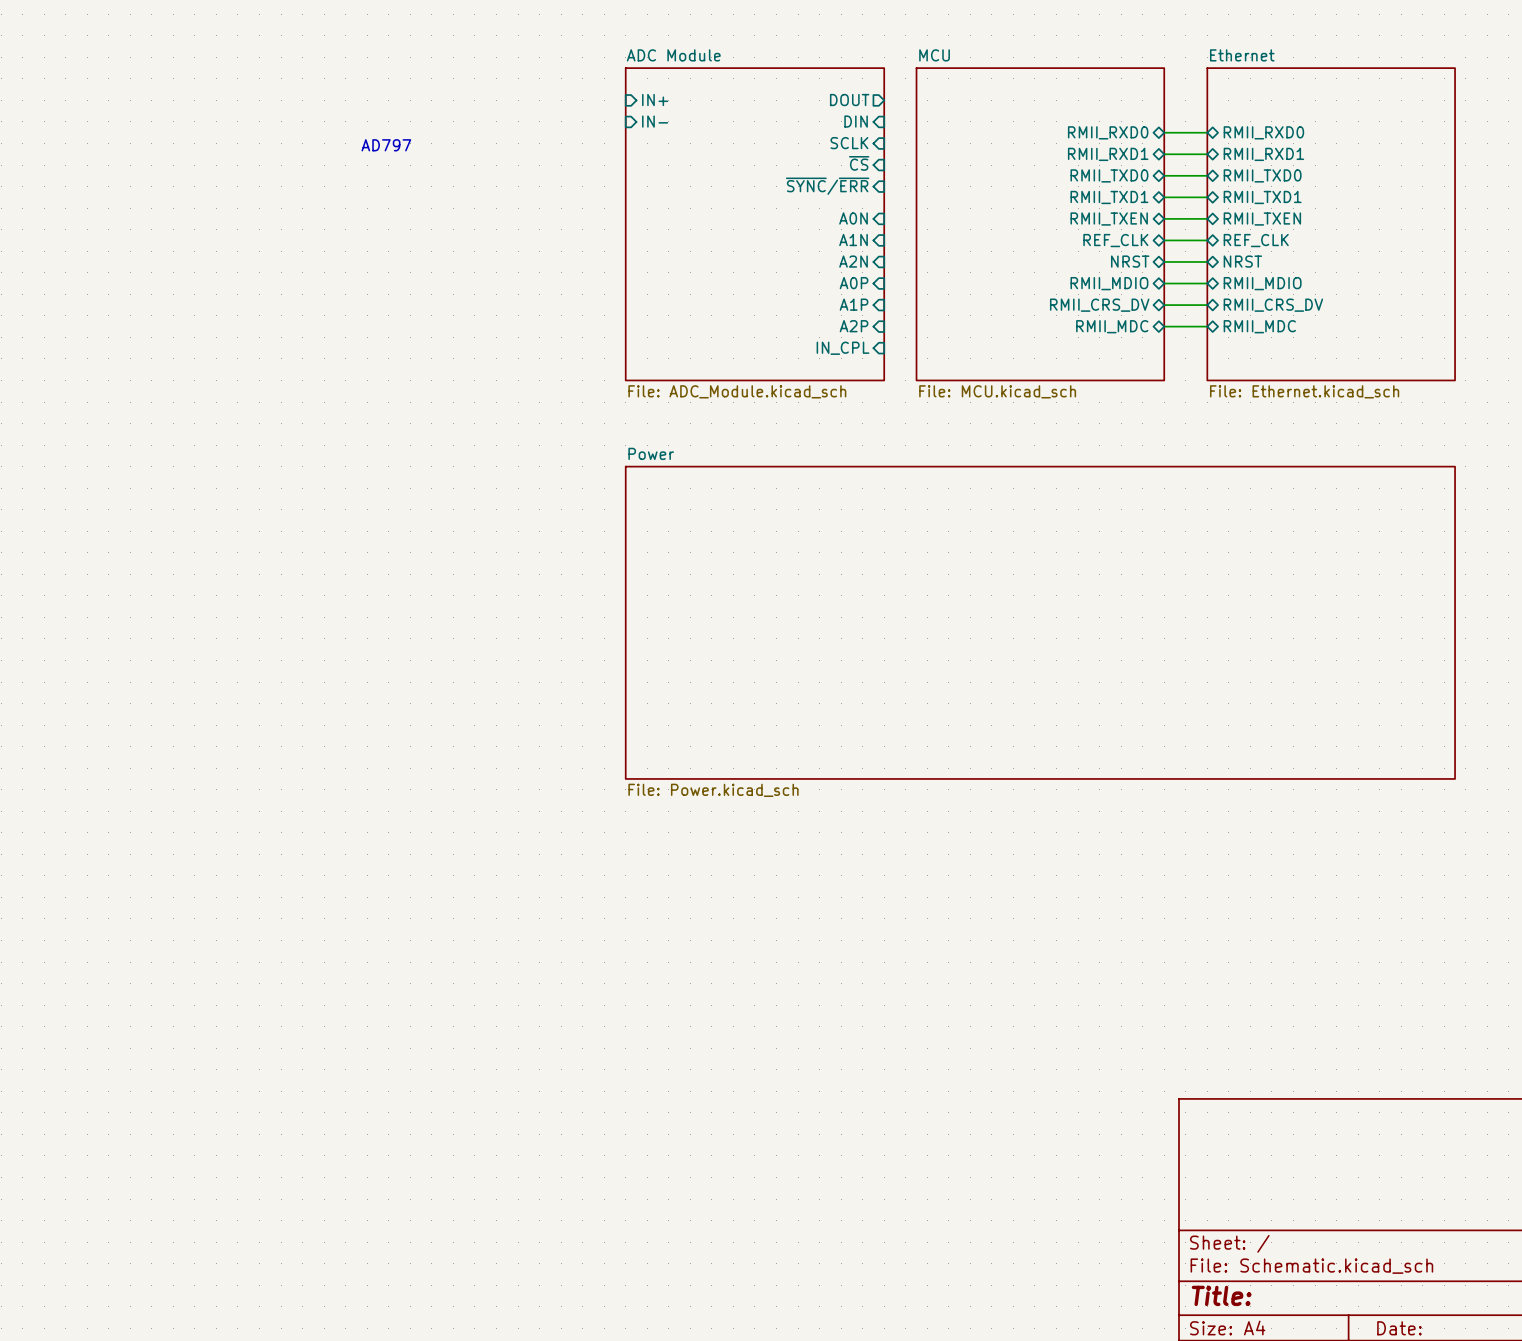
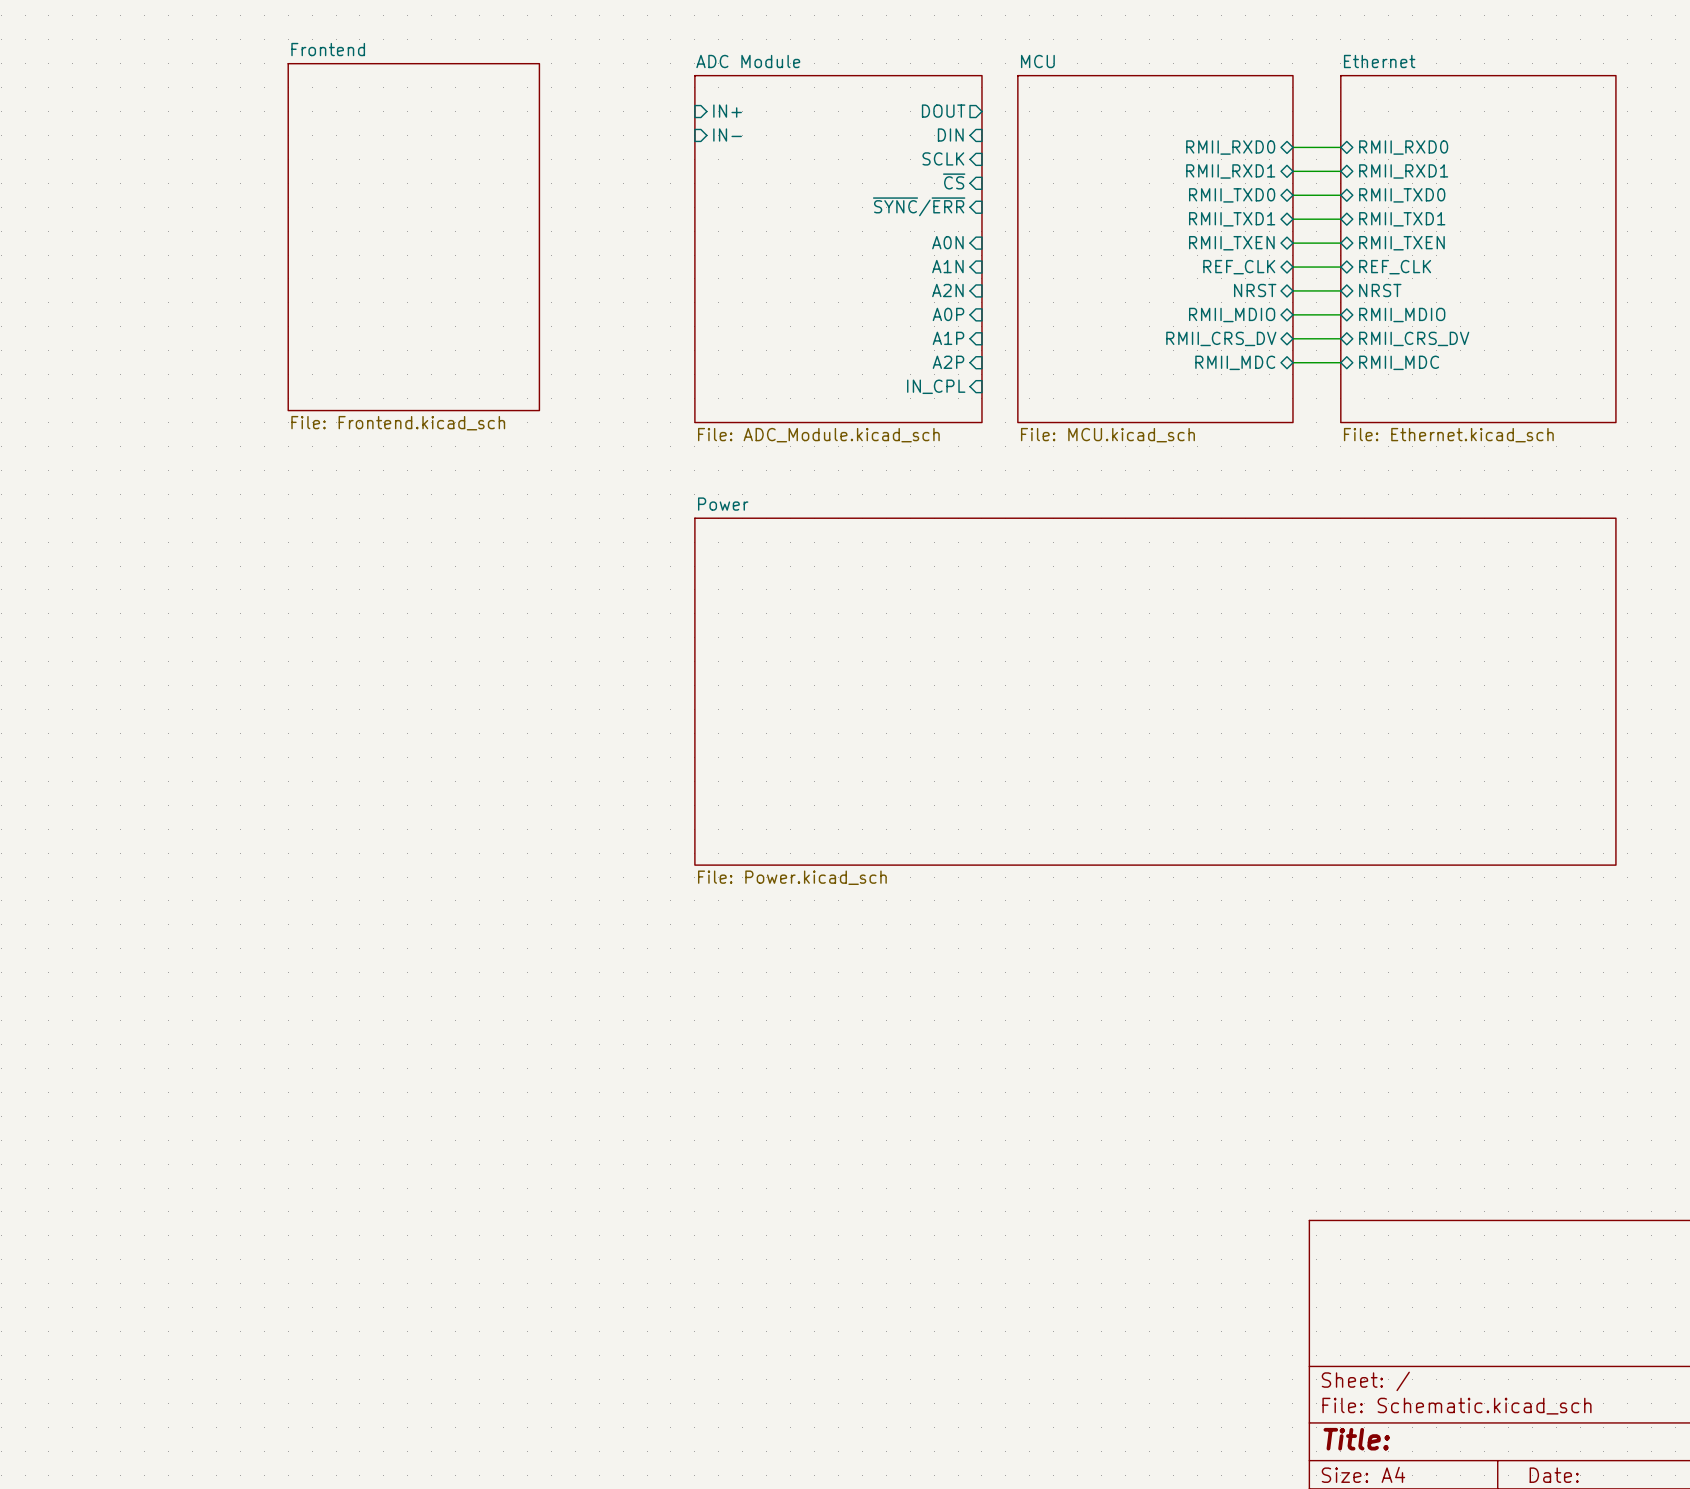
text: AD797 (386, 145) -> none
sheet Frontend: none -> File: Frontend.kicad_sch (413, 237)

